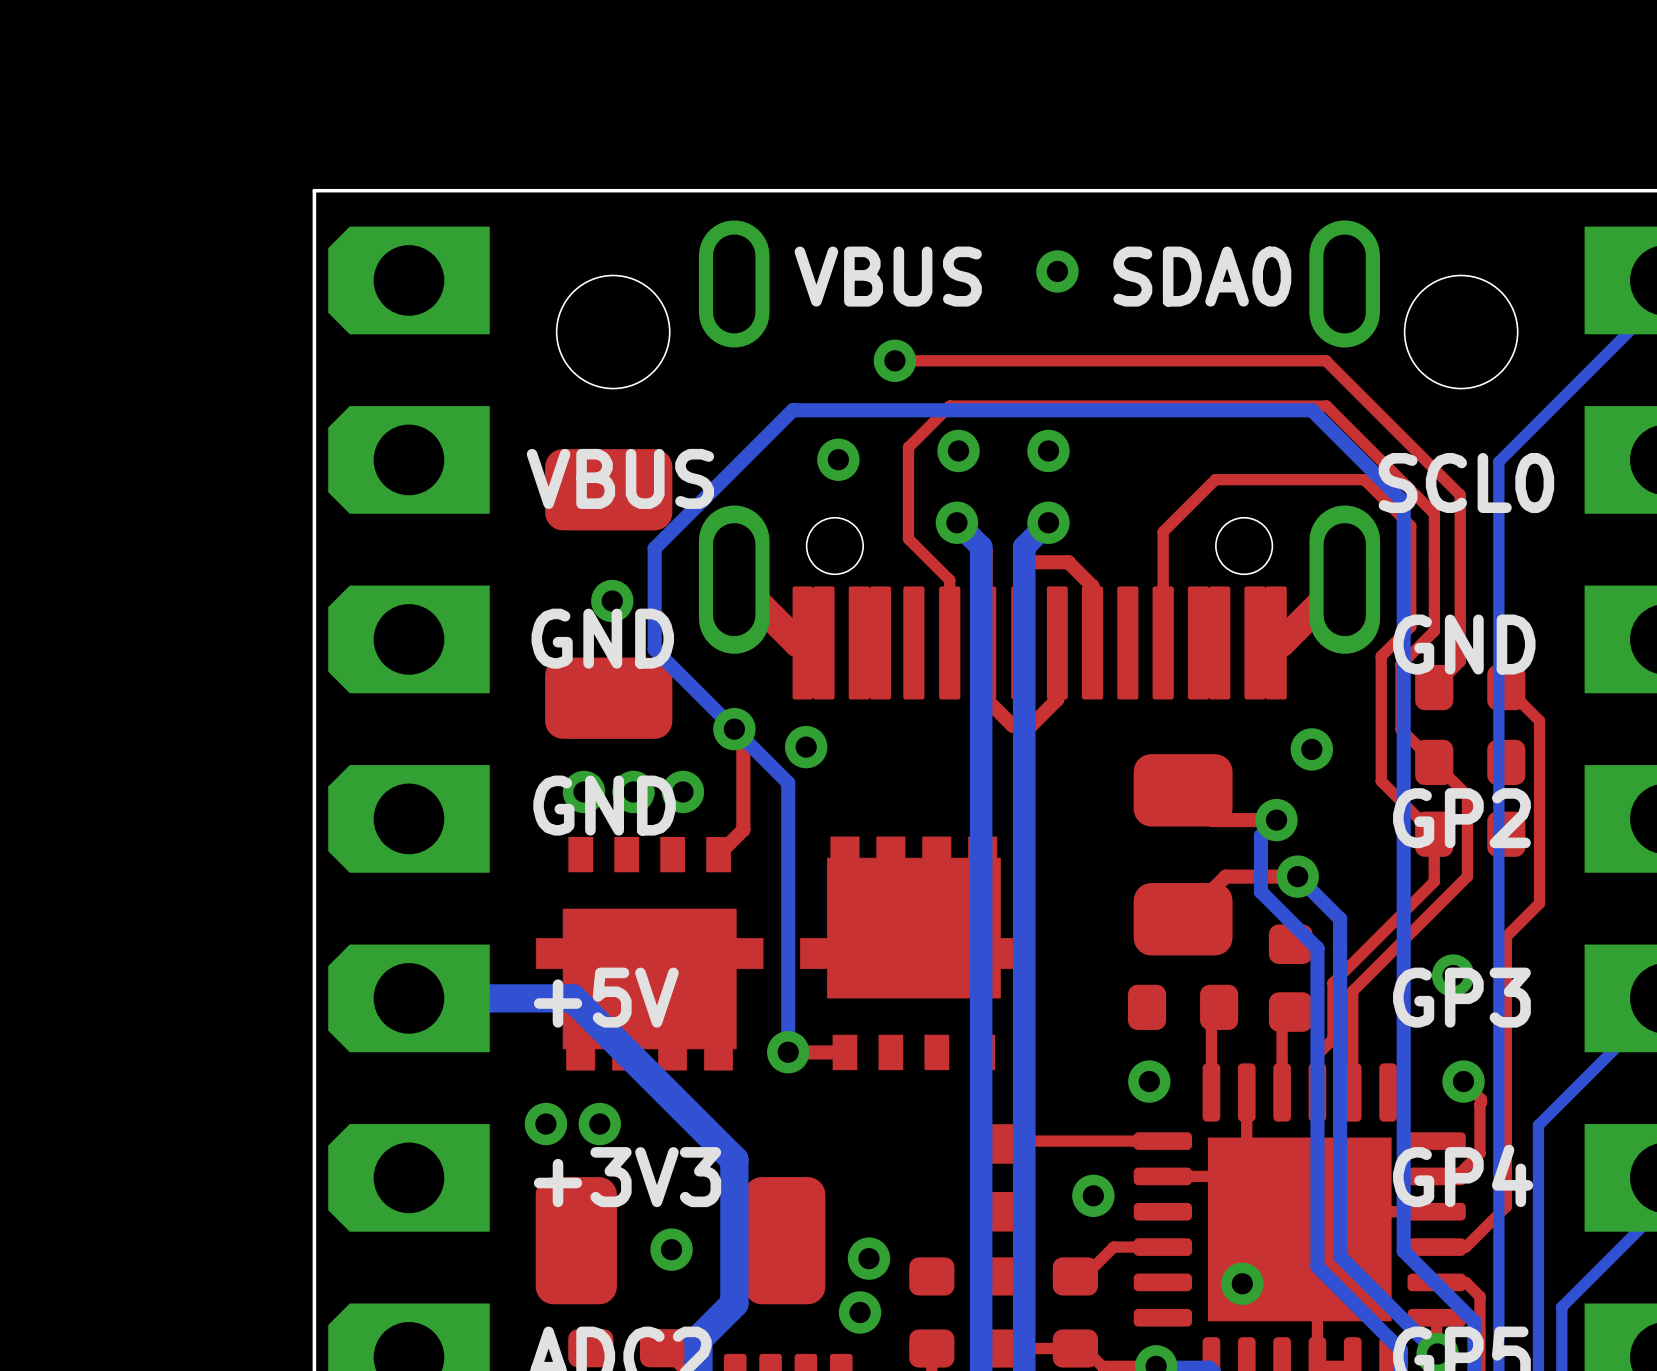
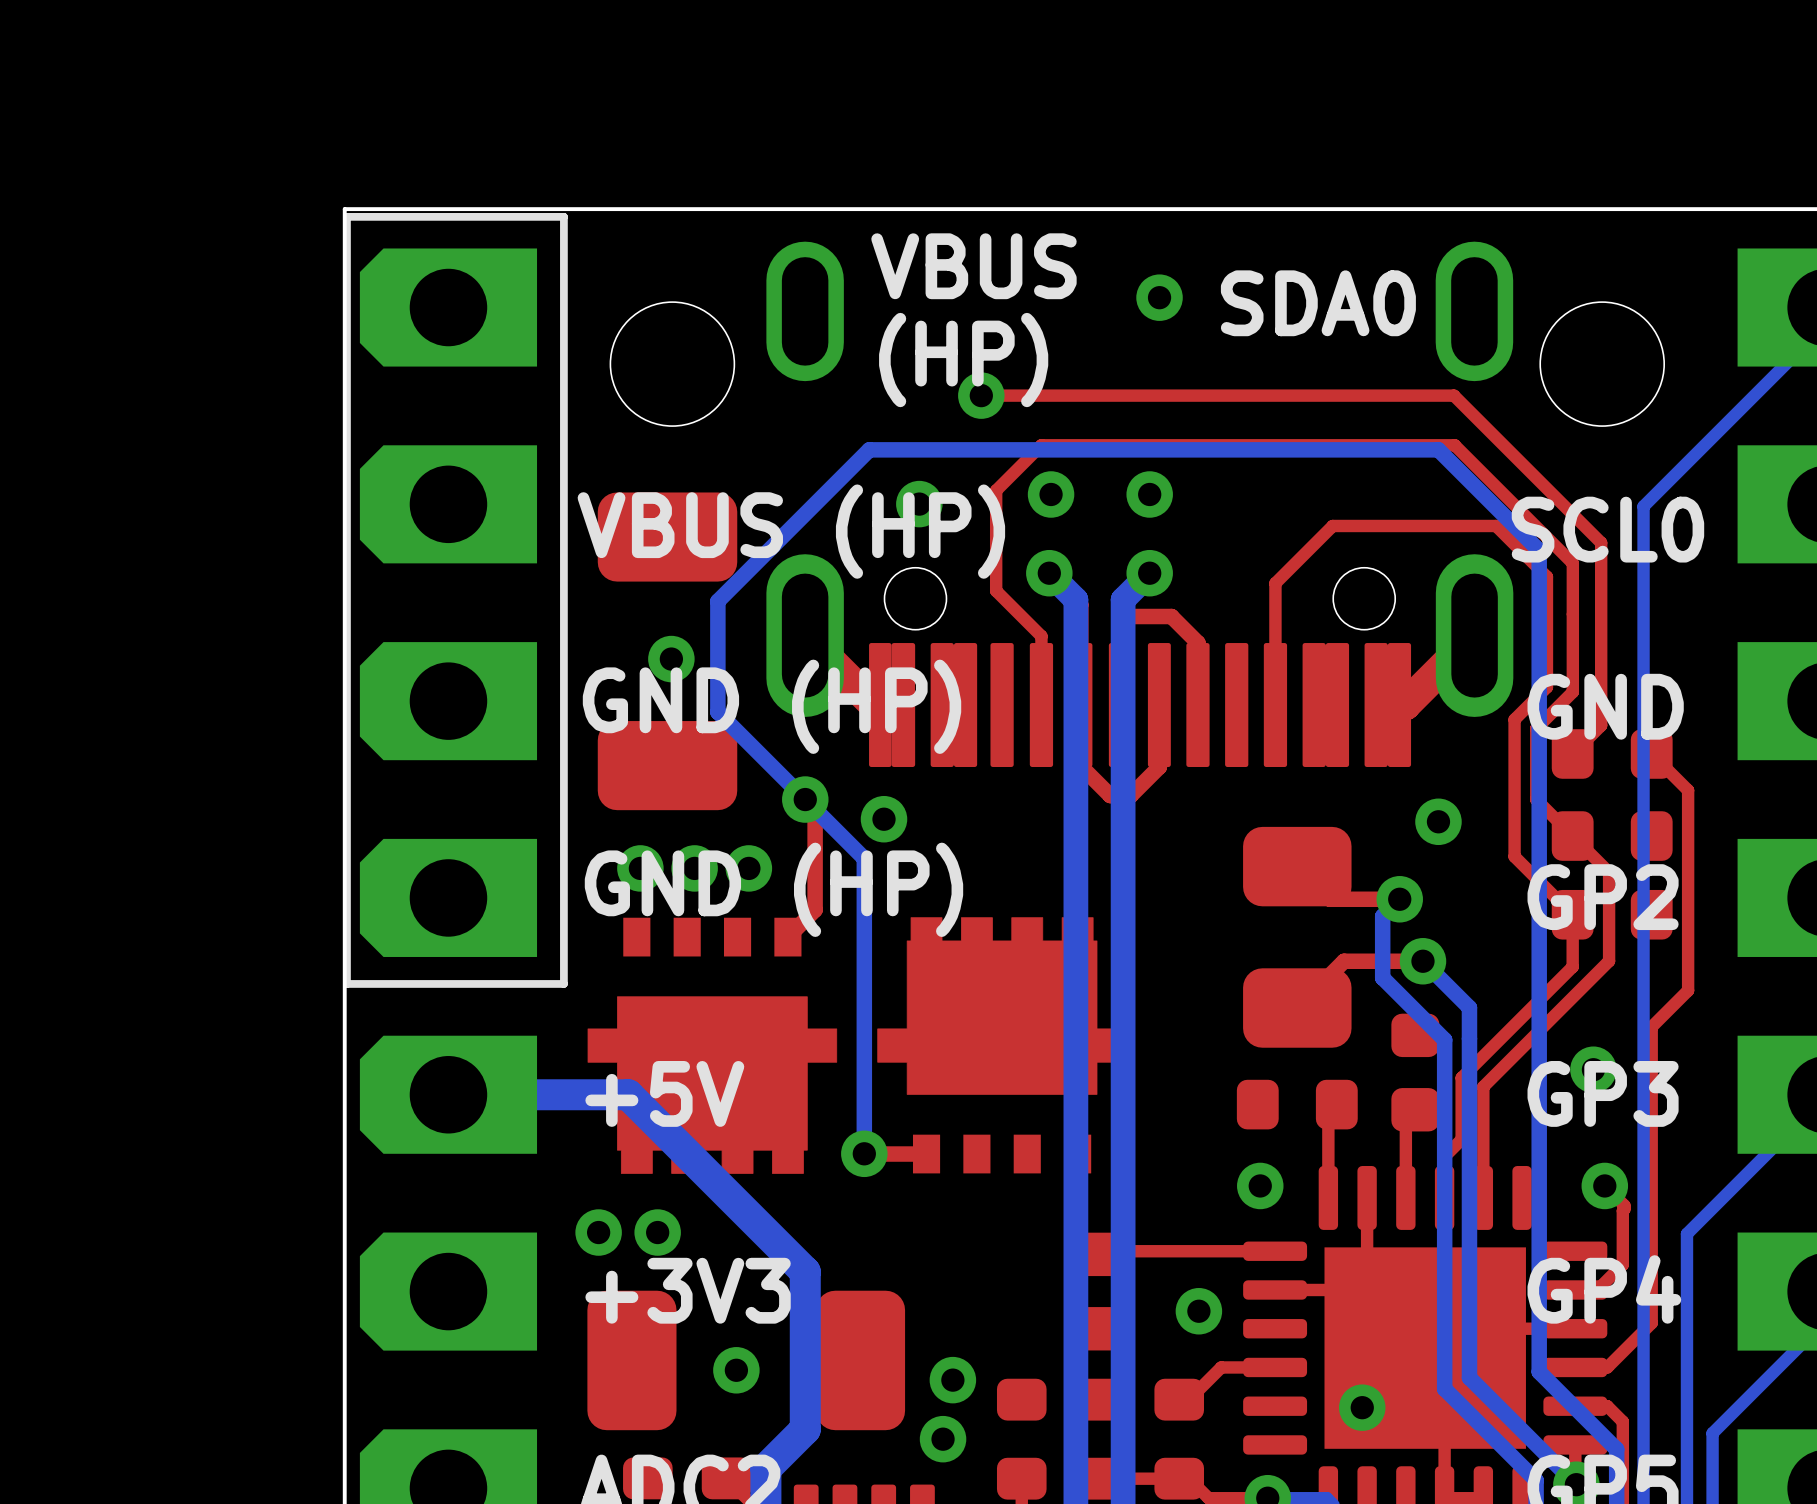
line: none -> (563, 216) (346, 216) (346, 983) (563, 983) (563, 216)
text position: VBUS (888, 276) -> VBUS (973, 266)
text: none -> (HP) (963, 360)
text: VBUS (620, 478) -> VBUS (HP) (791, 531)
text: GND (602, 638) -> GND (HP) (772, 706)
text: GND (604, 805) -> GND (HP) (773, 889)

